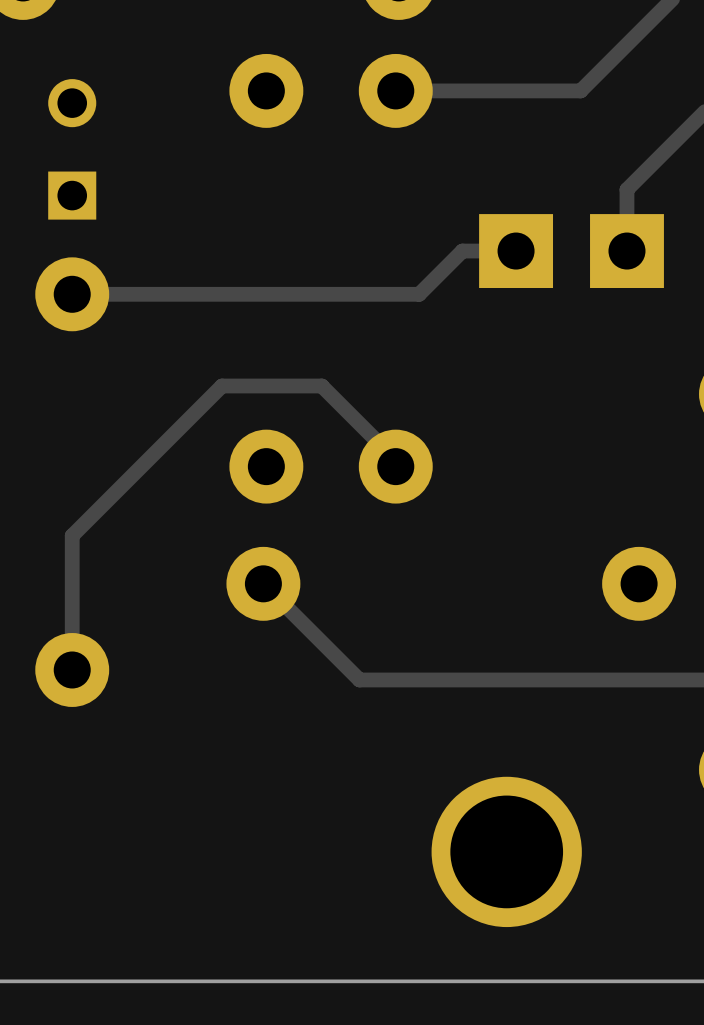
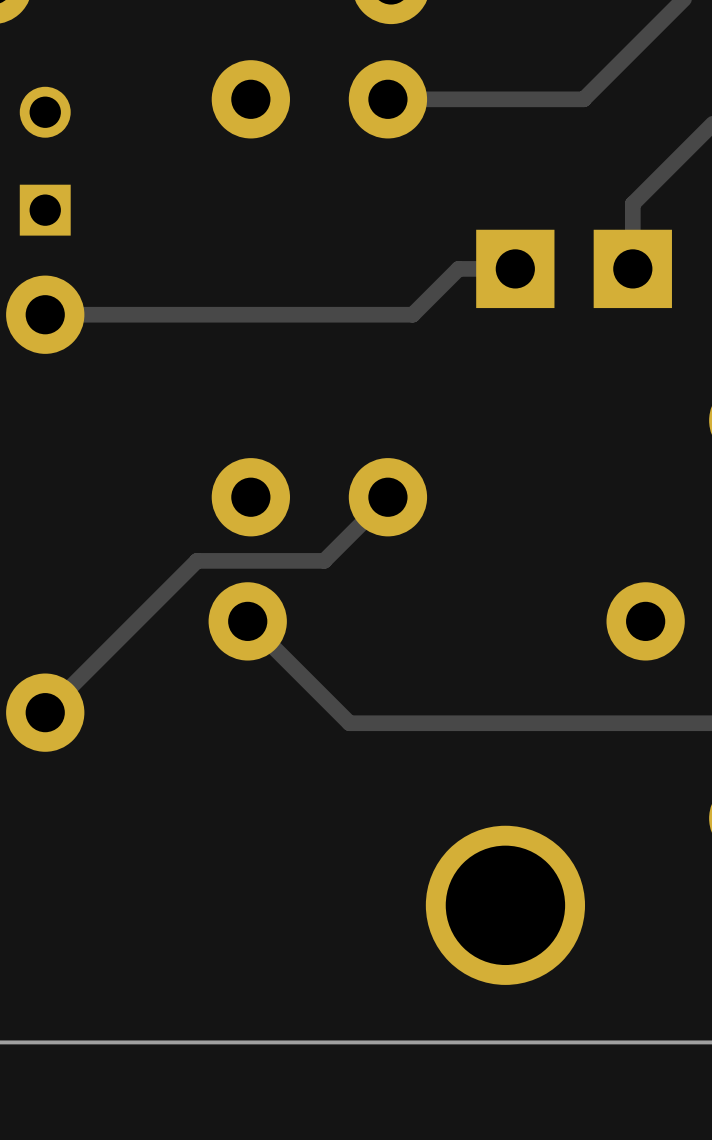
track: (395, 466) (395, 459) (321, 386) (221, 386) (72, 535) (72, 669) -> (387, 497) (324, 560) (197, 560) (45, 712)

